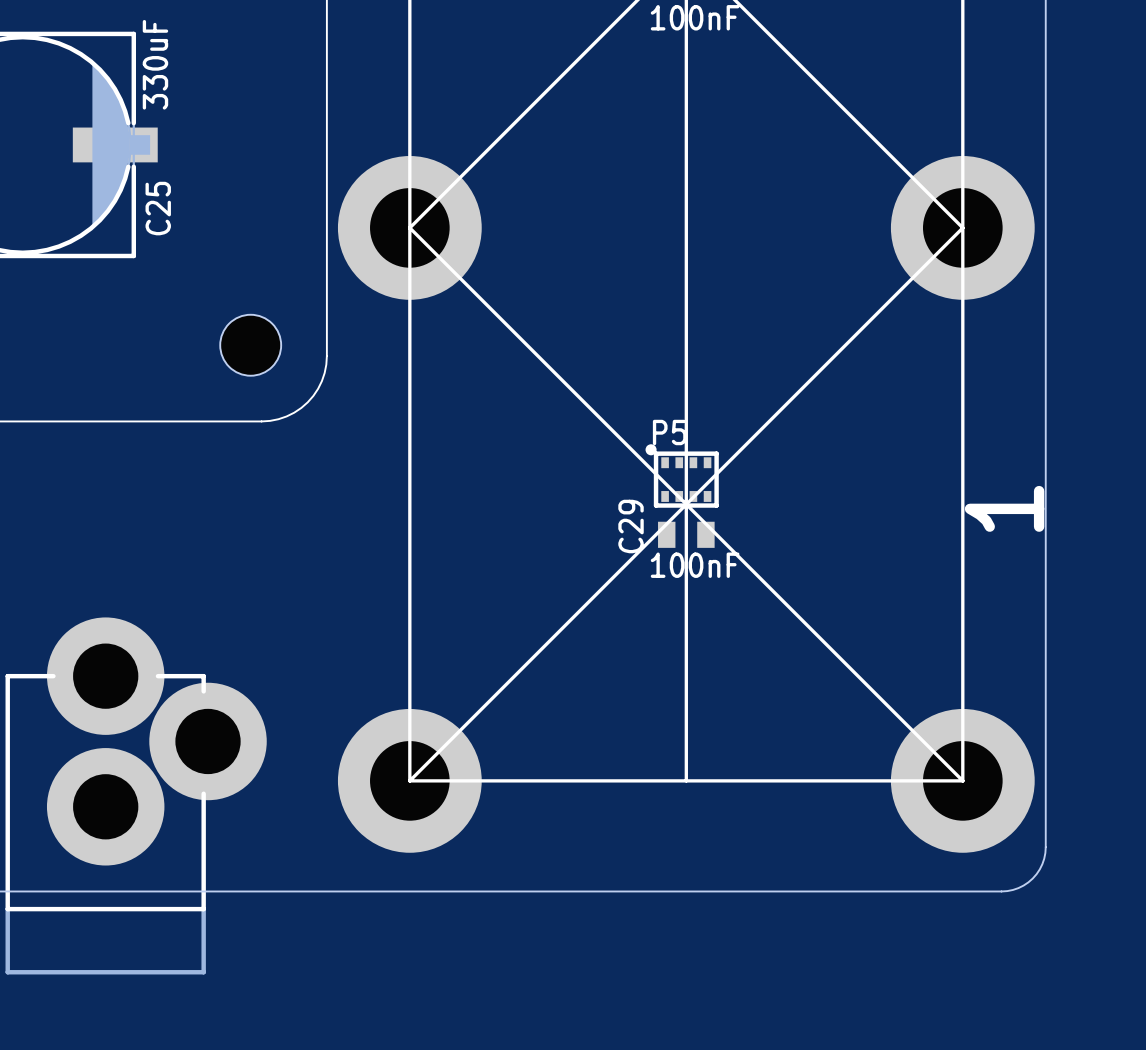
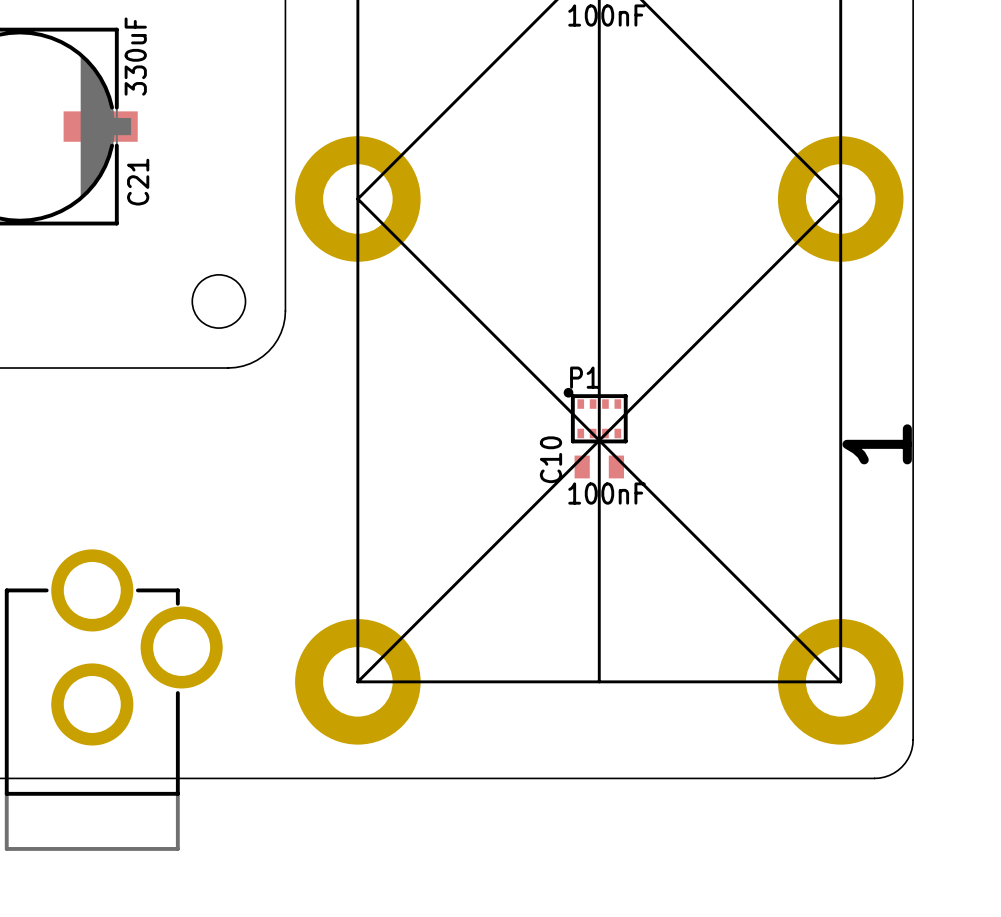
C25 name: C25 (158, 208) -> C21 (138, 182)
P5 name: P5 (669, 432) -> P1 (584, 377)
C29 name: C29 (631, 526) -> C10 (551, 459)
part footprint: [5, 617, 267, 975] -> [4, 549, 223, 851]

